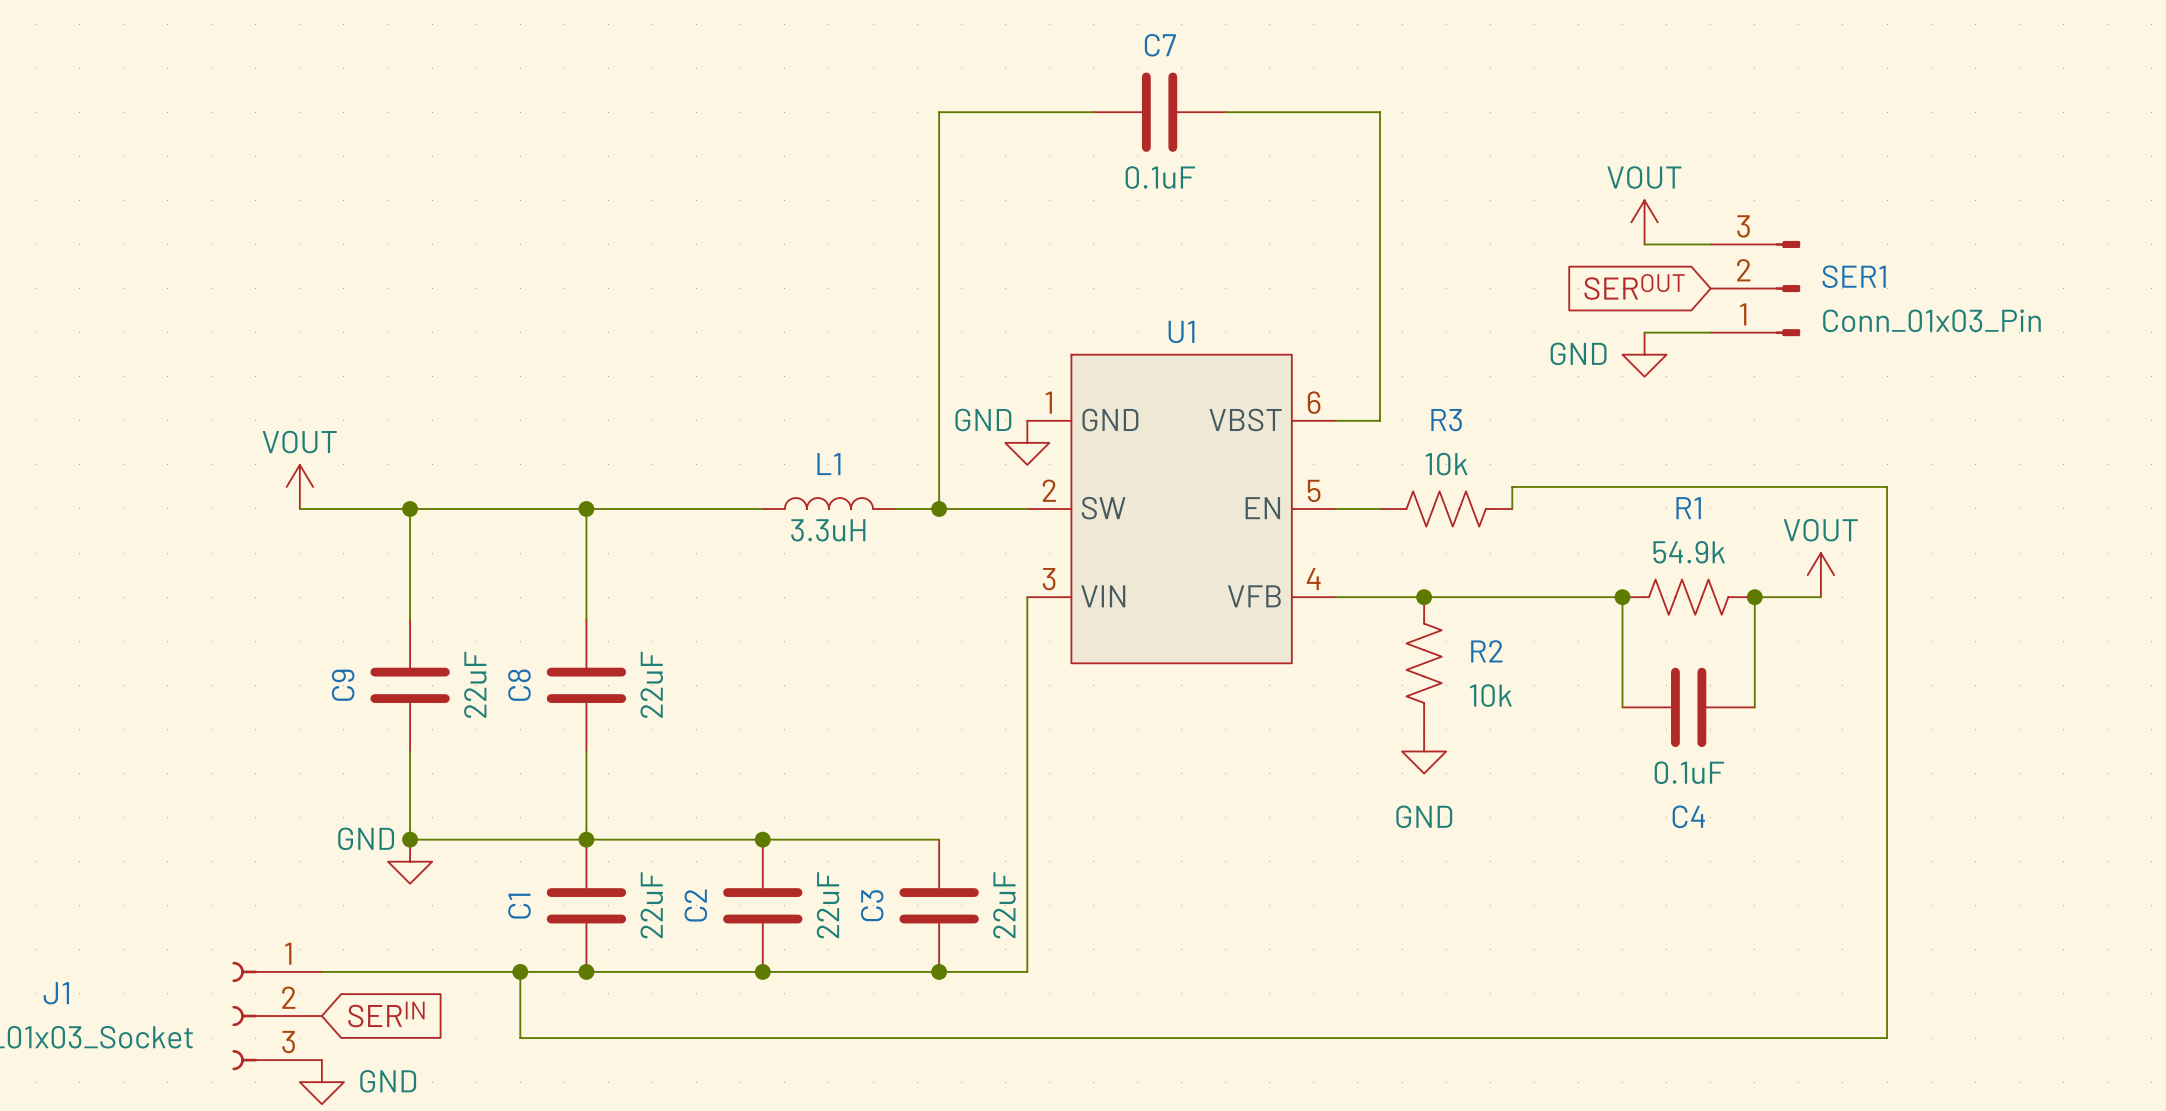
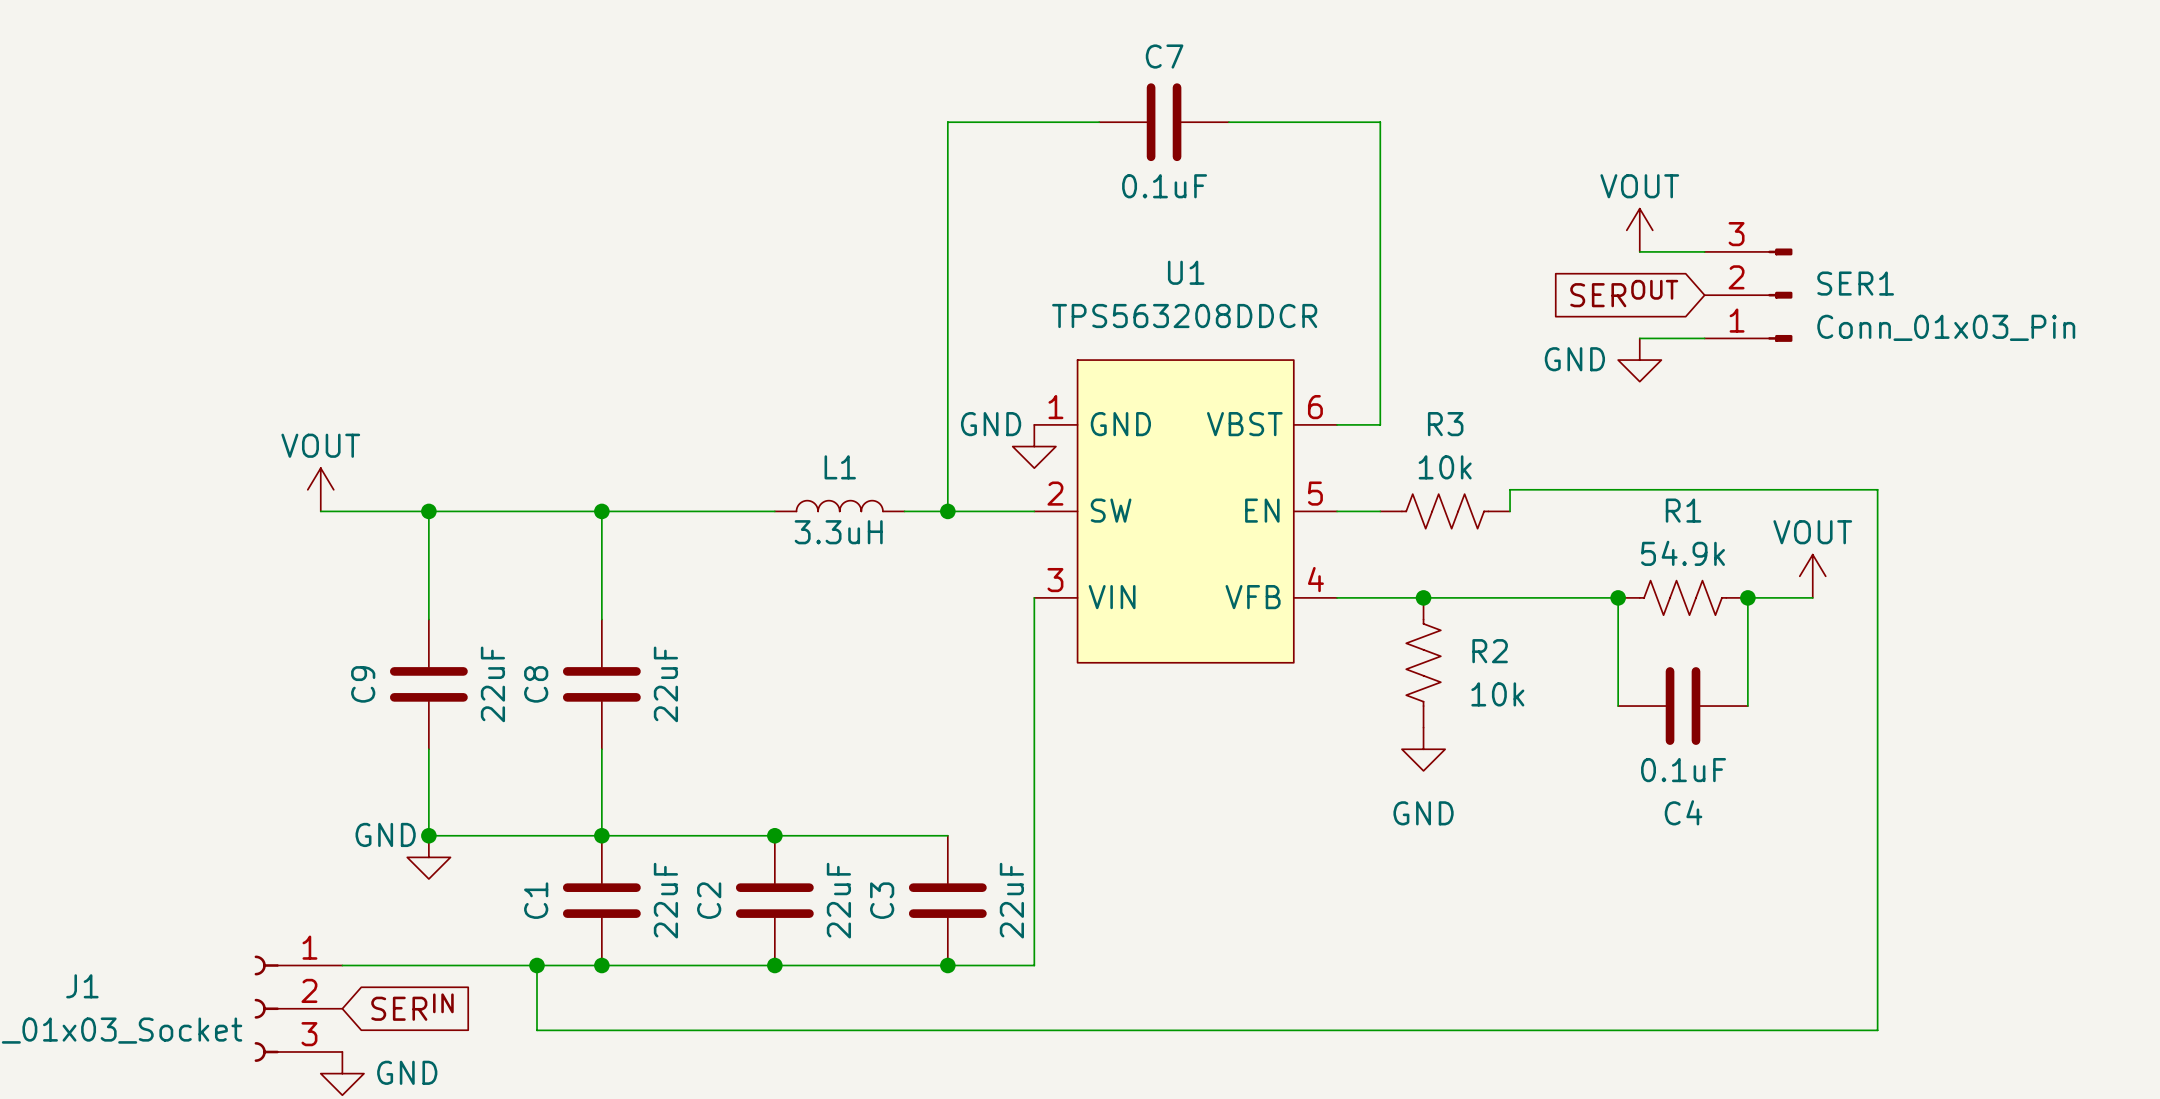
U1 value: none -> TPS563208DDCR (1184, 316)
U1 name position: U1 (1181, 331) -> U1 (1186, 272)

